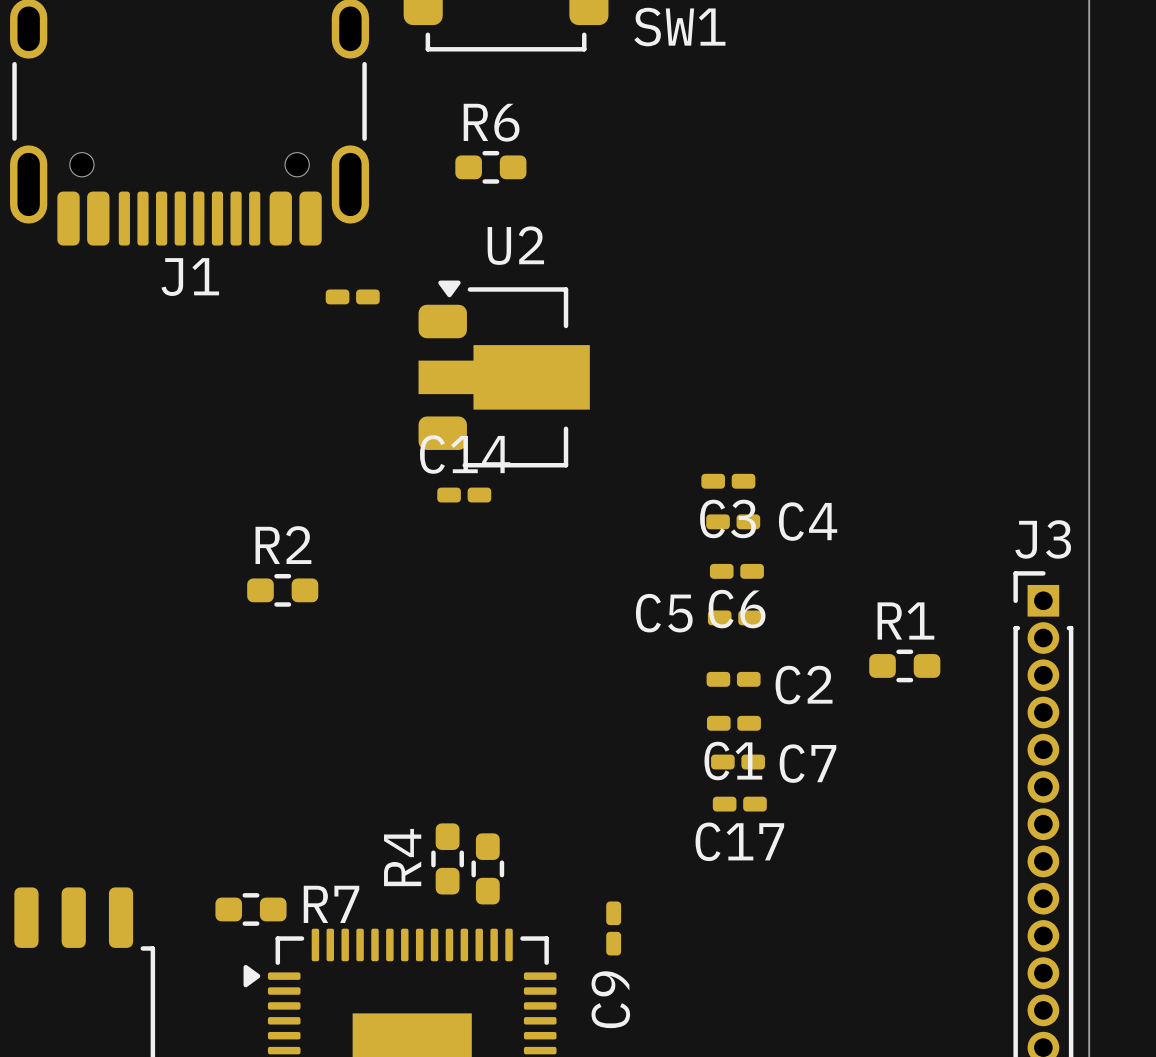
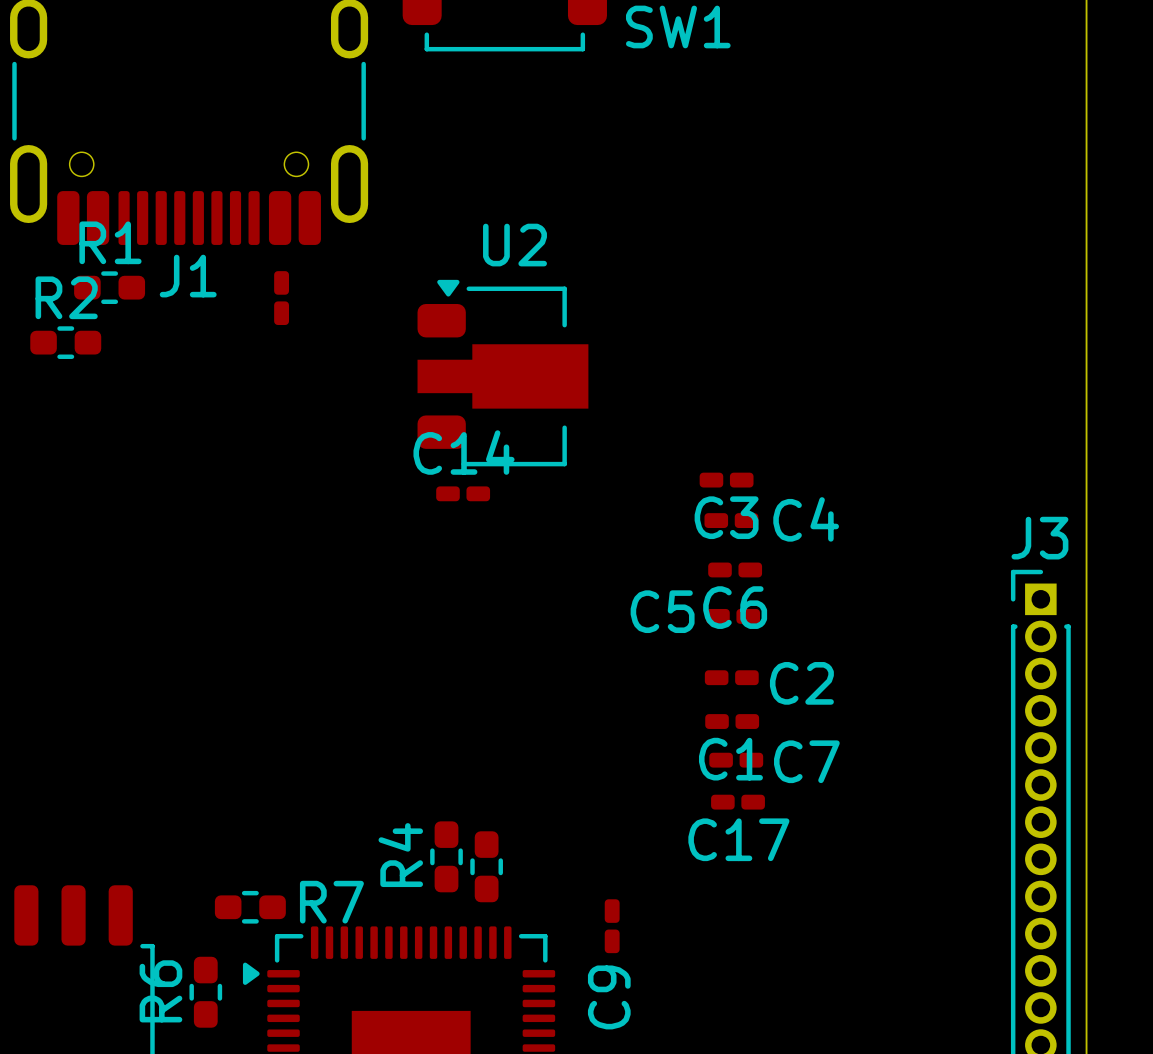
R6 rotation: 0° (490, 167) -> 90° clockwise (205, 992)
R6 position: (490, 167) -> (205, 992)
part rotation: 0° (352, 296) -> 90° clockwise (281, 298)
part position: (352, 296) -> (281, 298)
R2 position: (282, 590) -> (65, 342)
R1 position: (904, 665) -> (109, 287)

